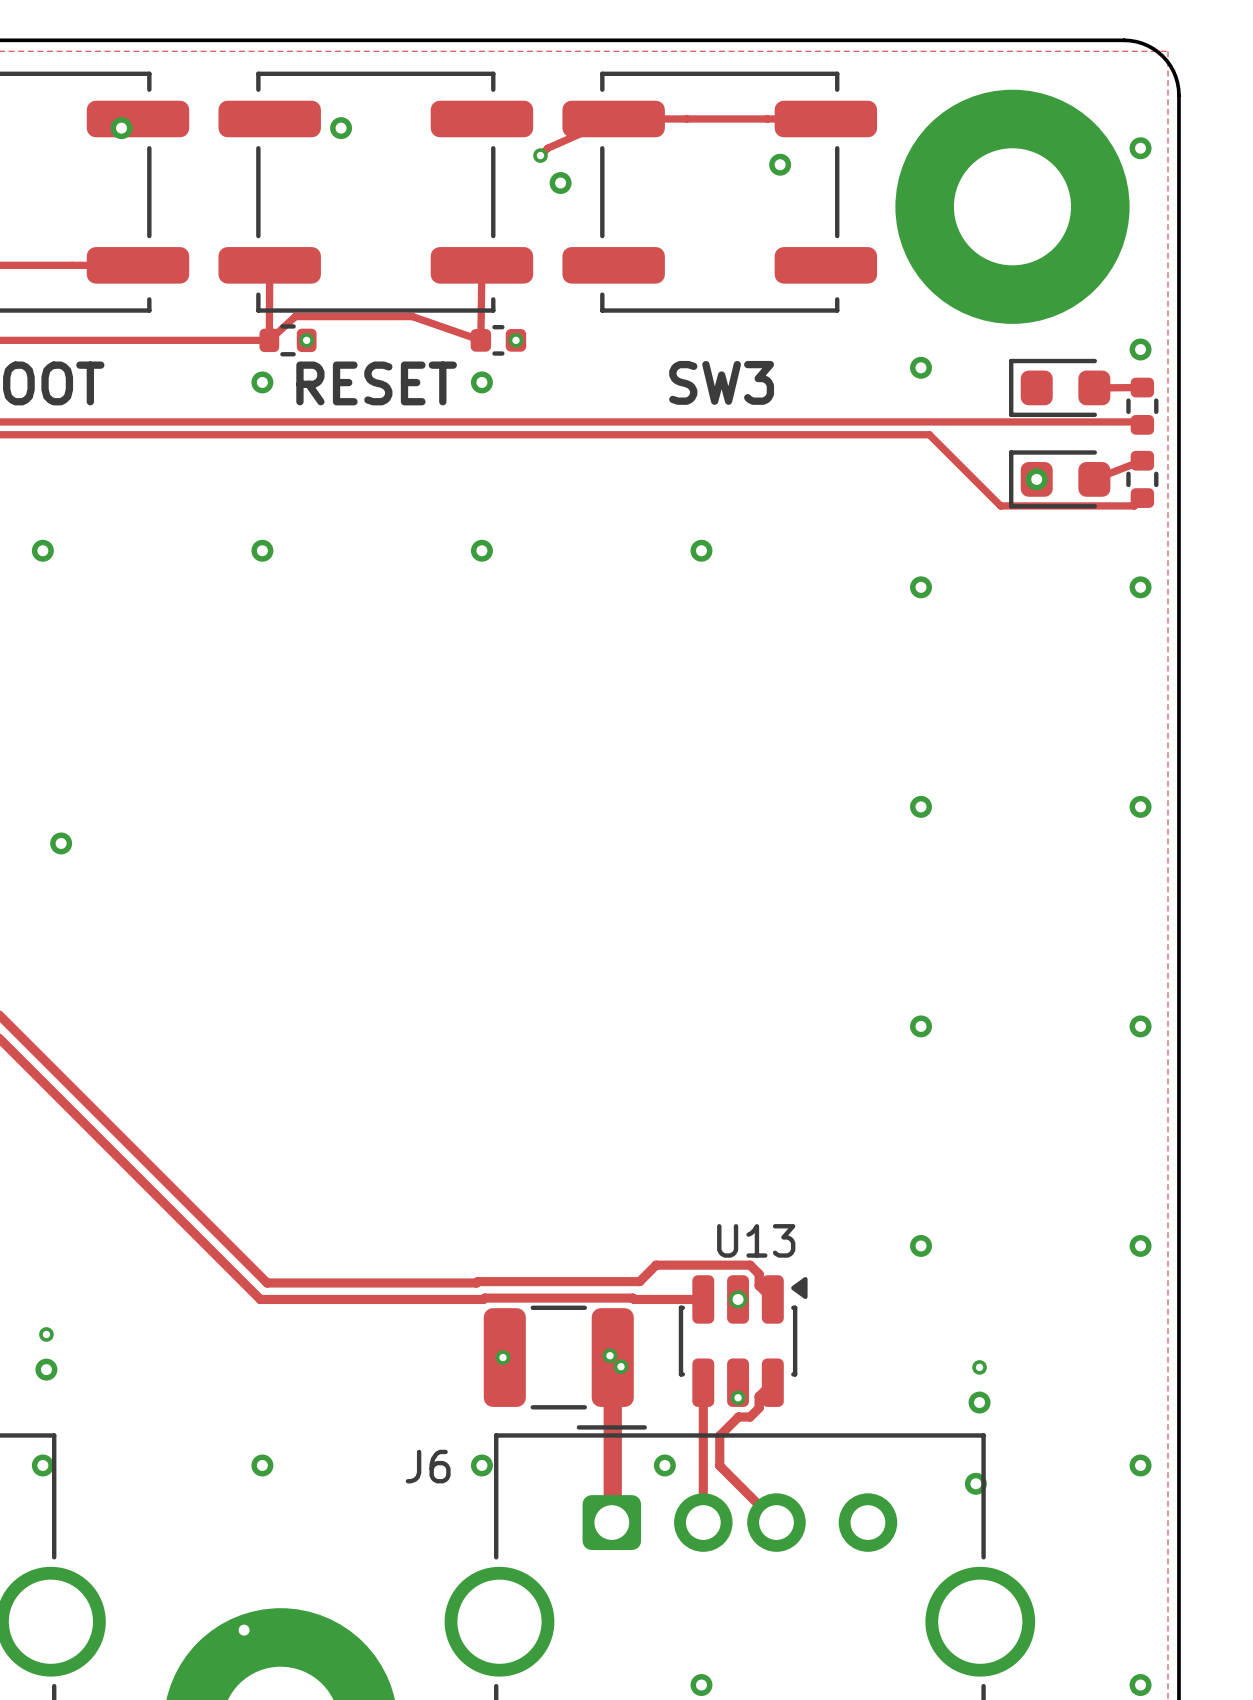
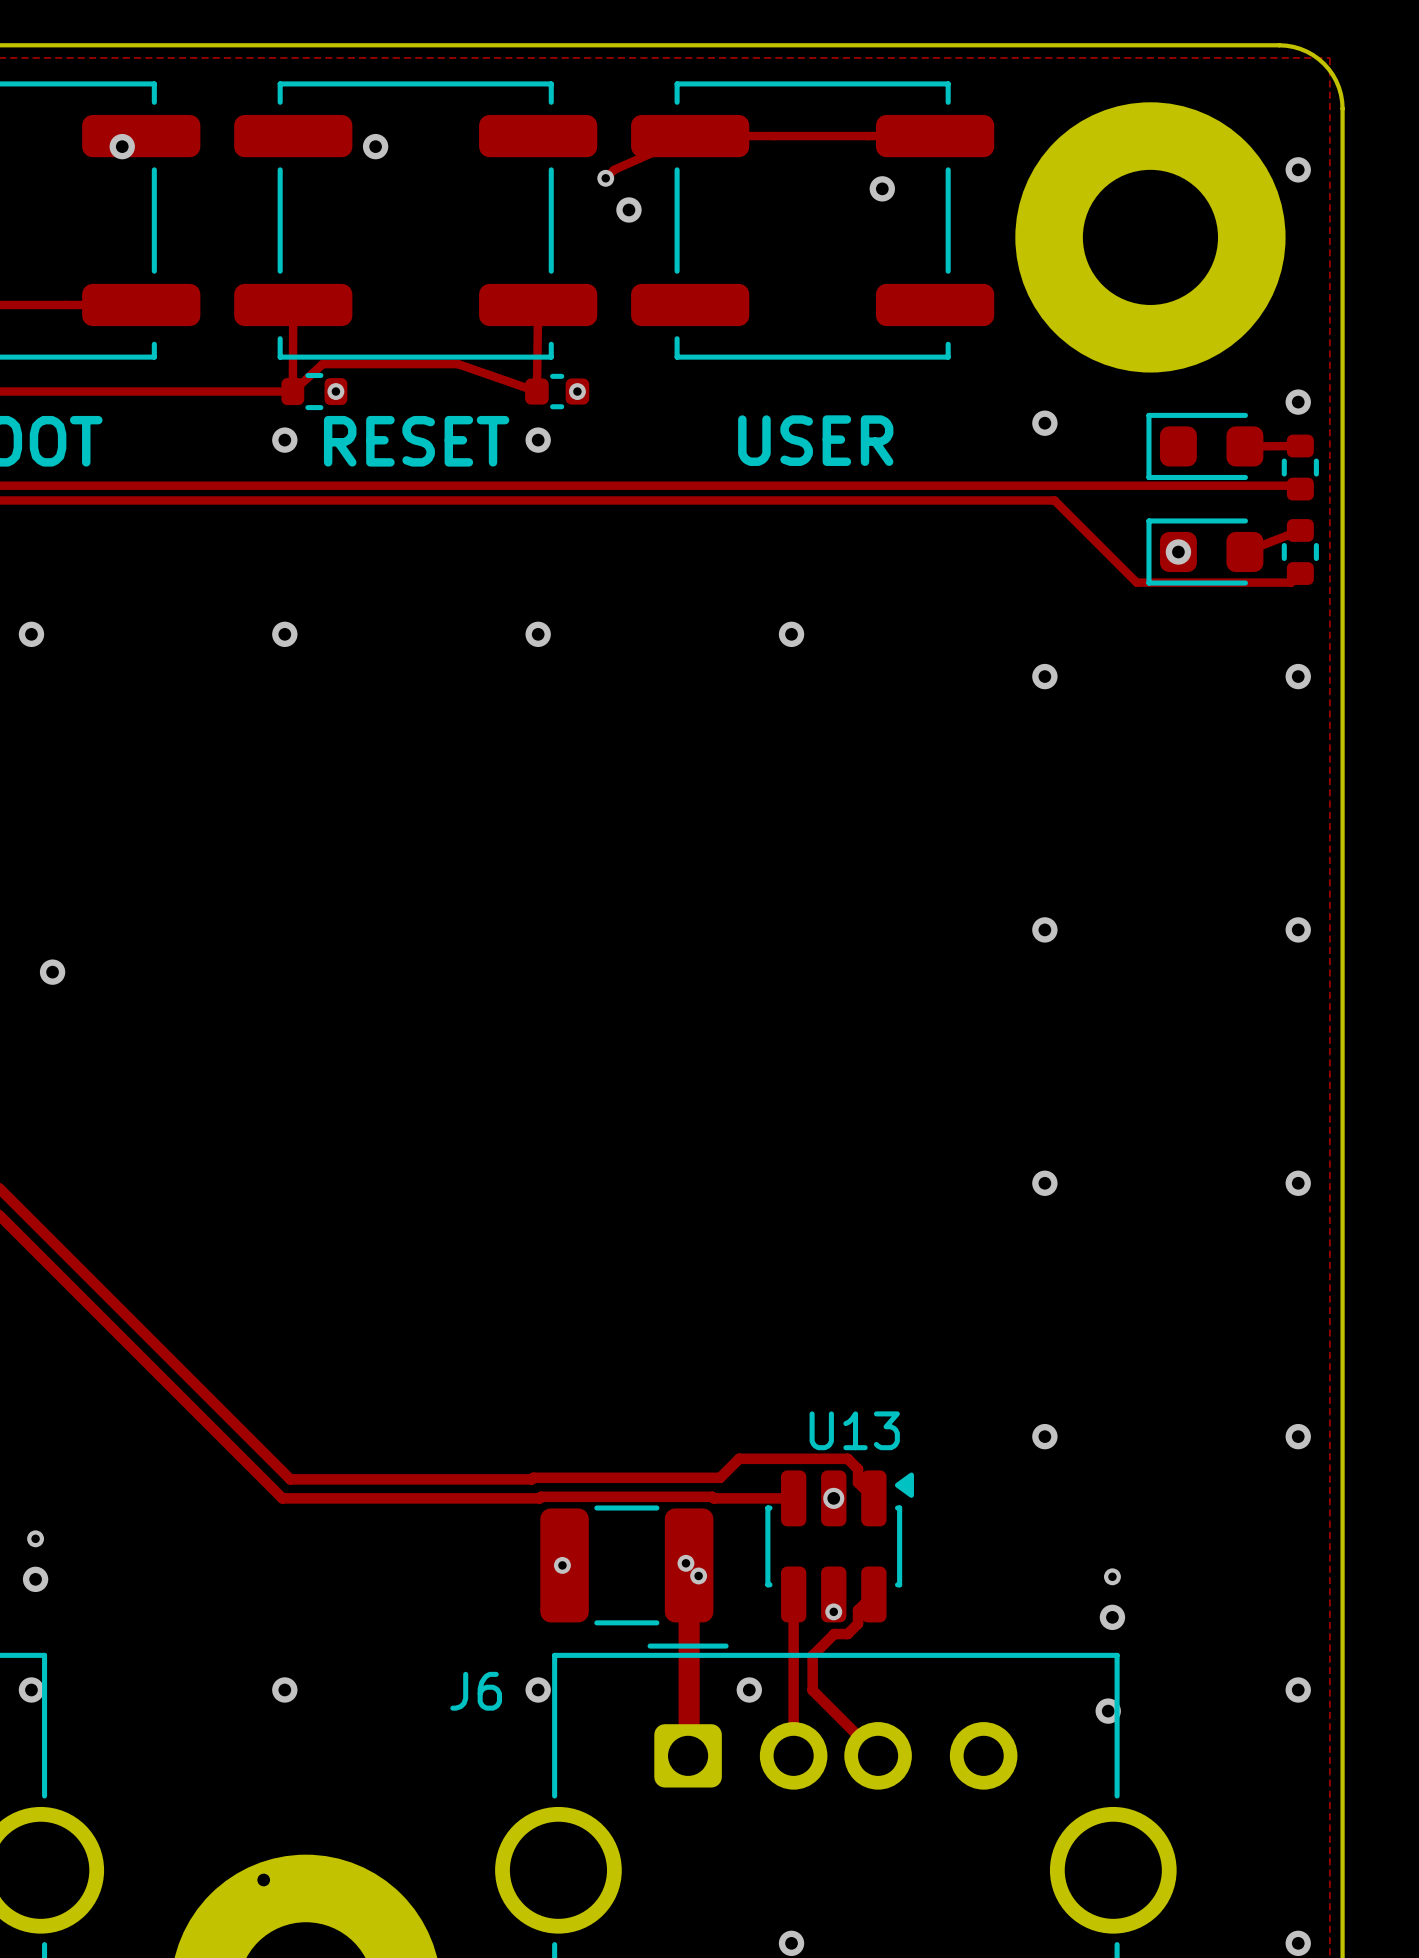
SW3 name: SW3 (721, 382) -> USER (815, 440)

